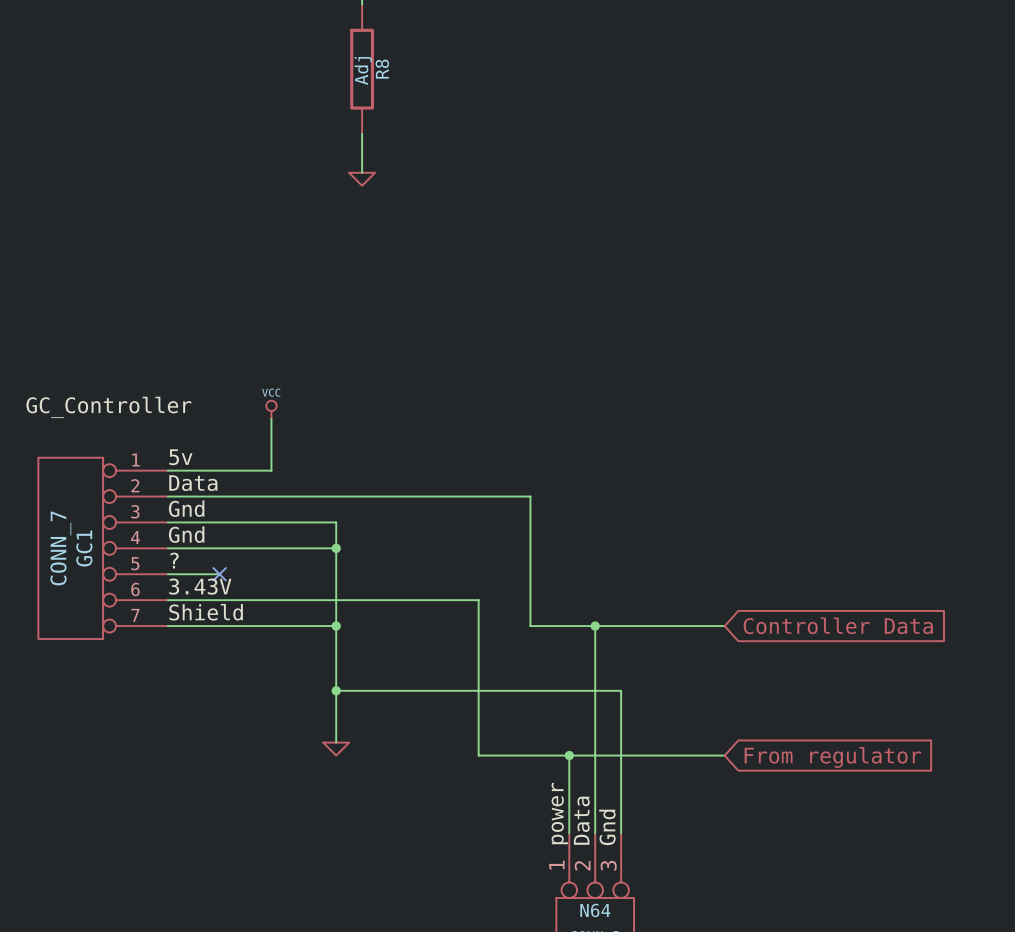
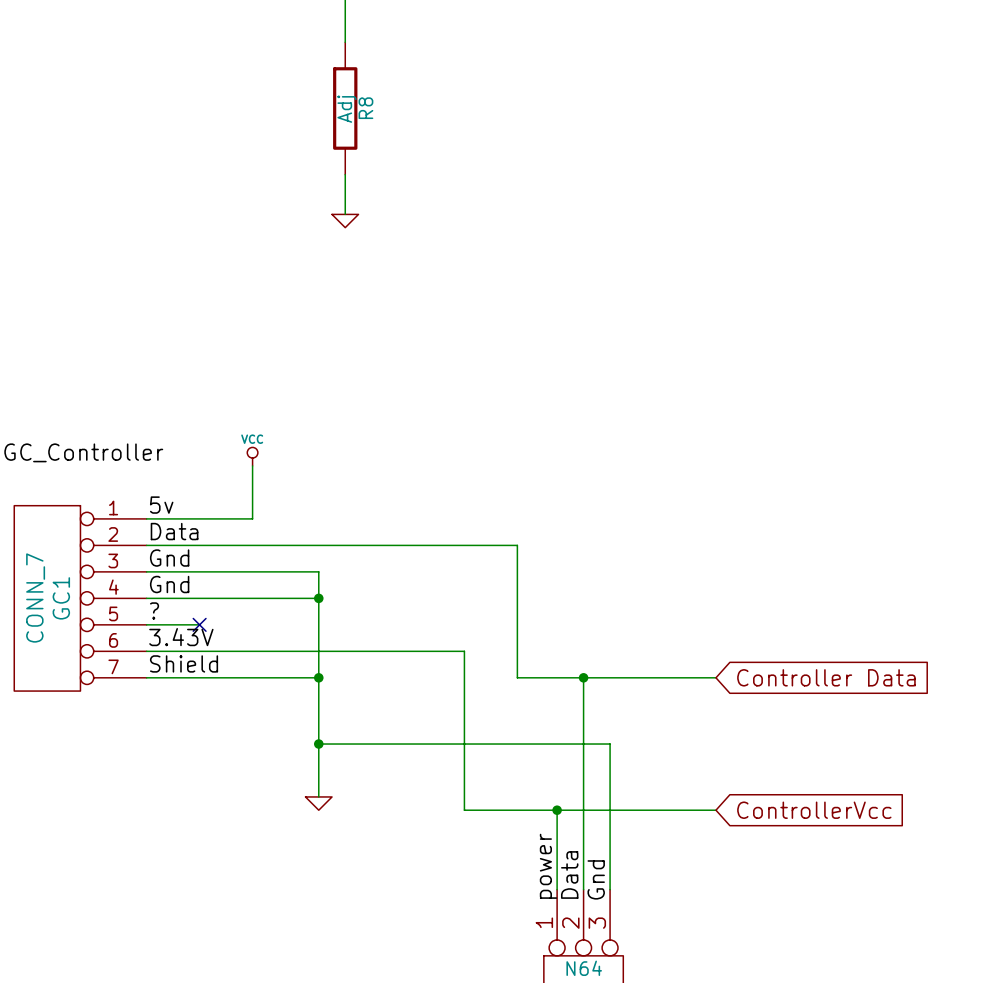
global label: From regulator (832, 757) -> ControllerVcc (814, 810)

